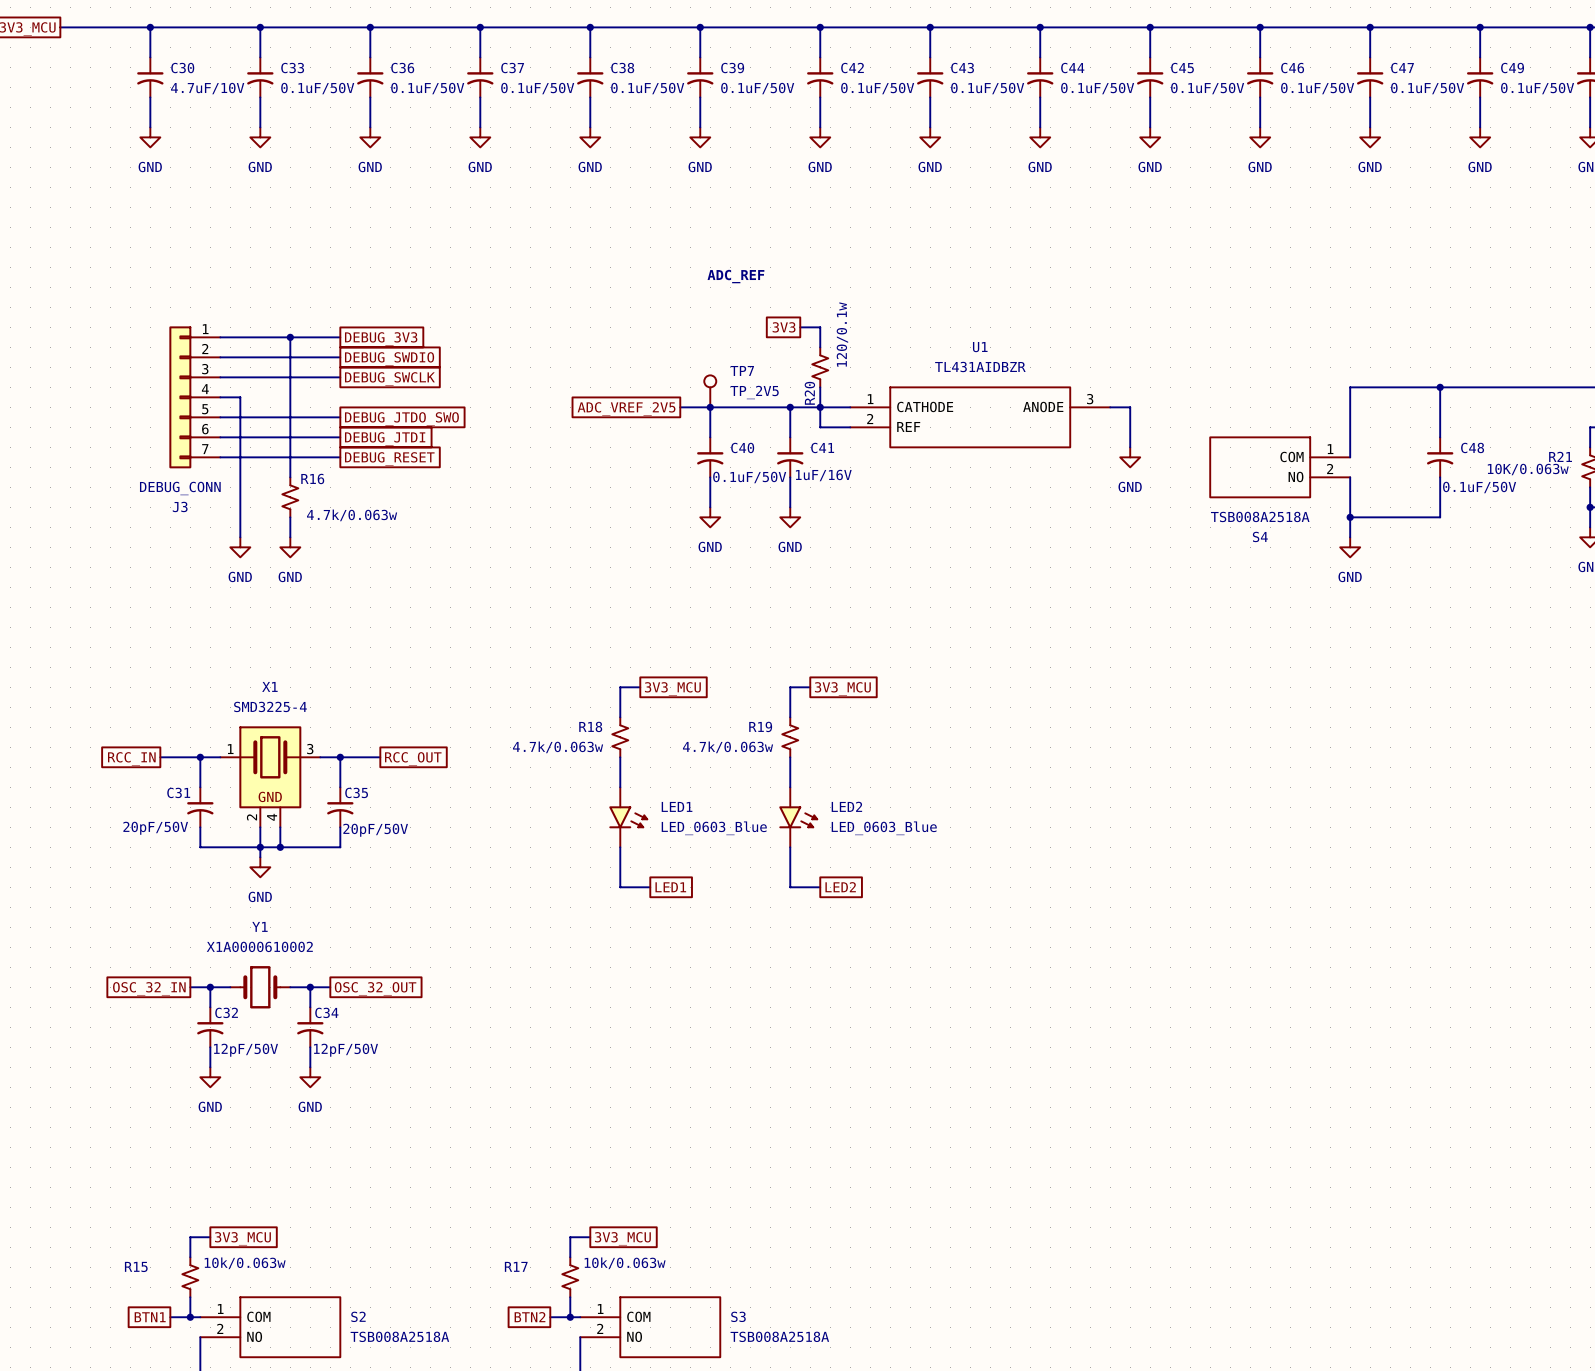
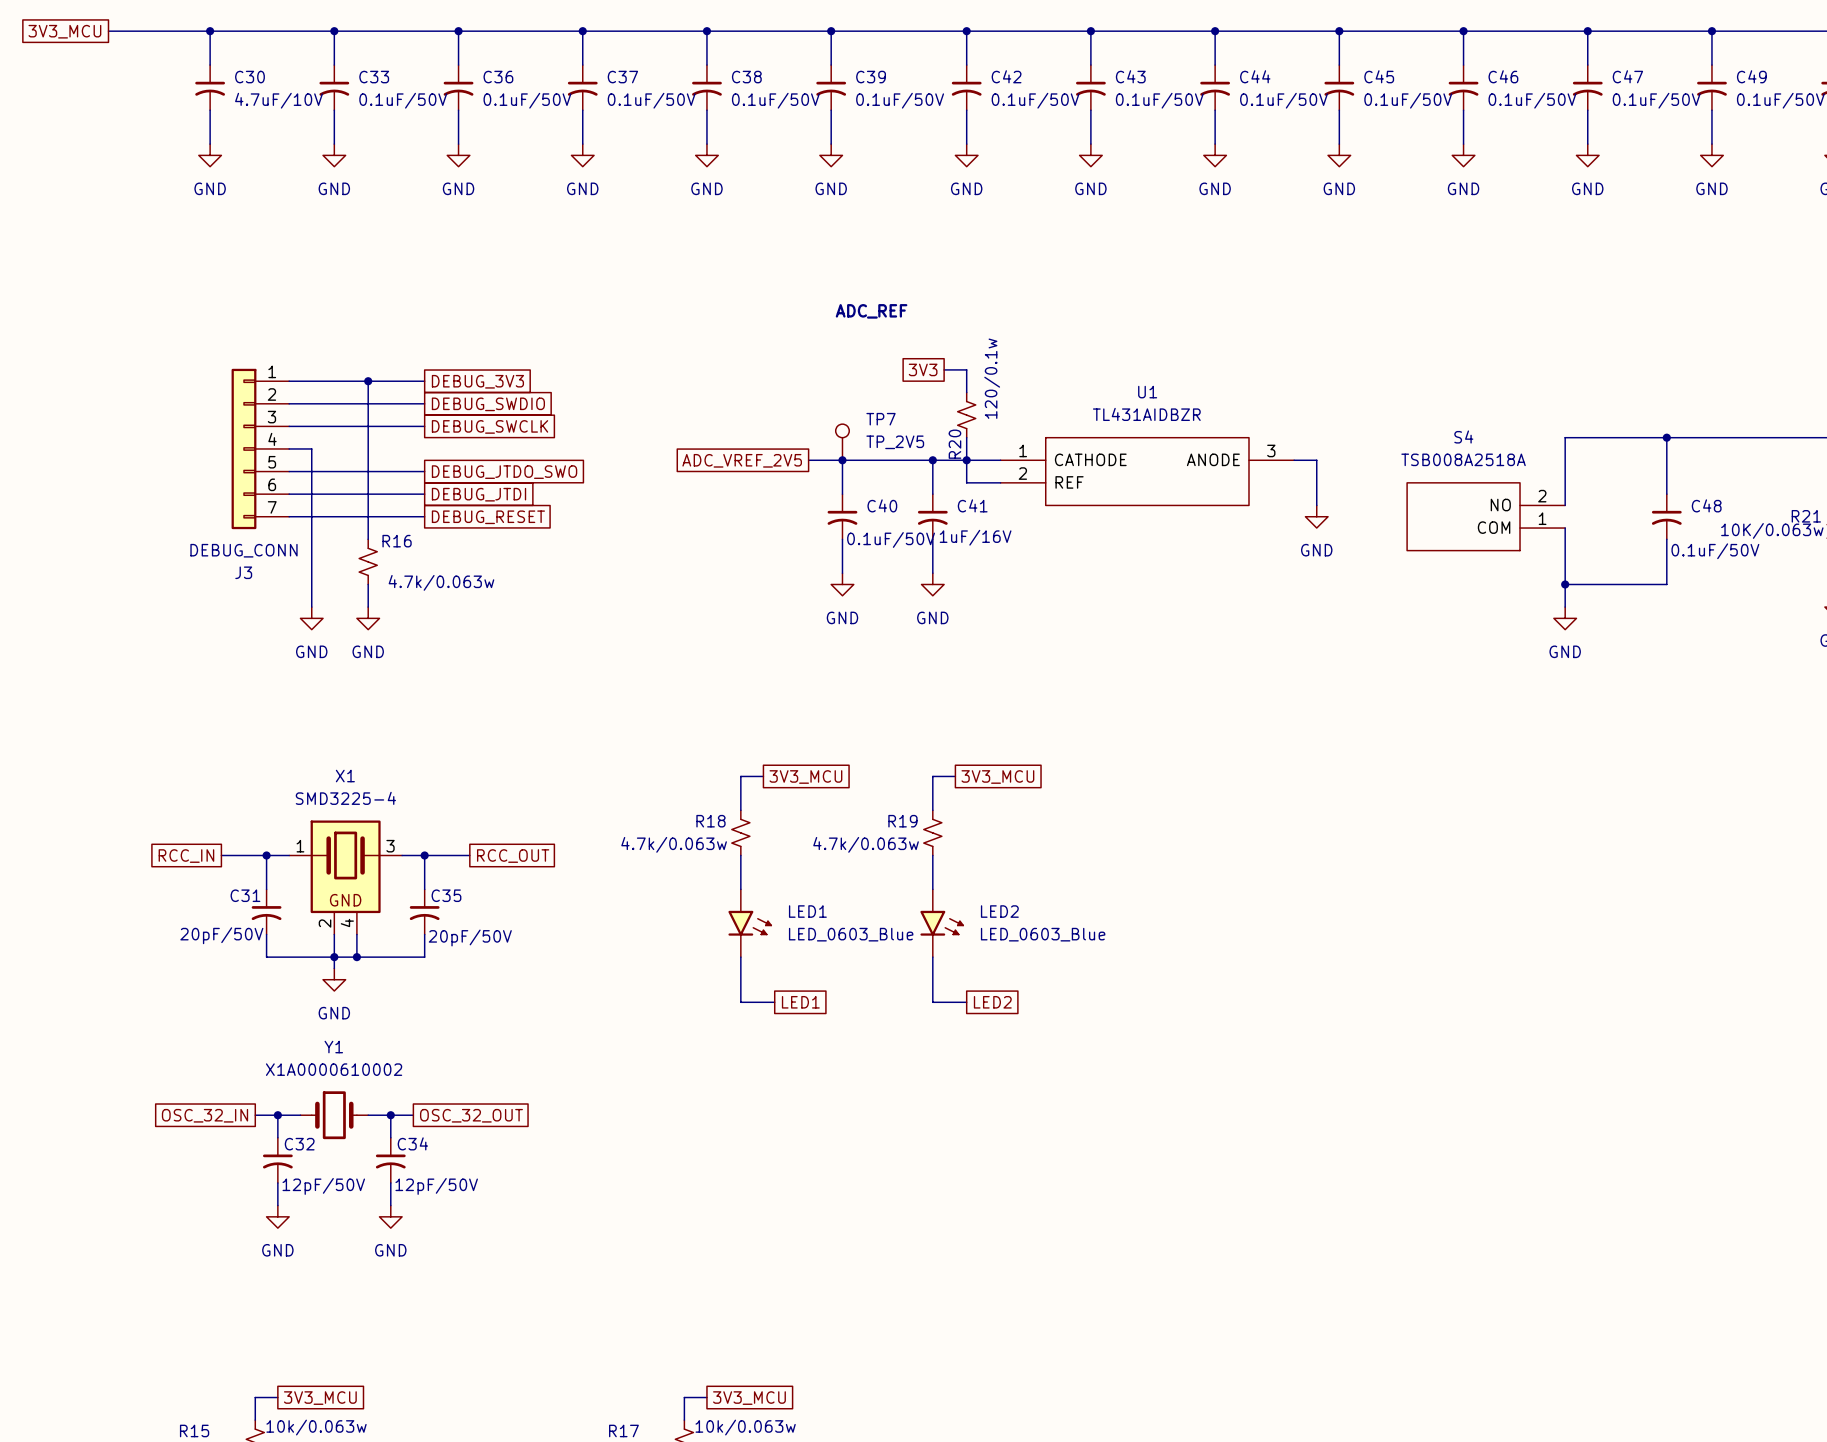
wire: (1350, 447) (1350, 457) -> (1565, 528) (1565, 539)
S4 flip: as is (1260, 467) -> up-down (1463, 516)

